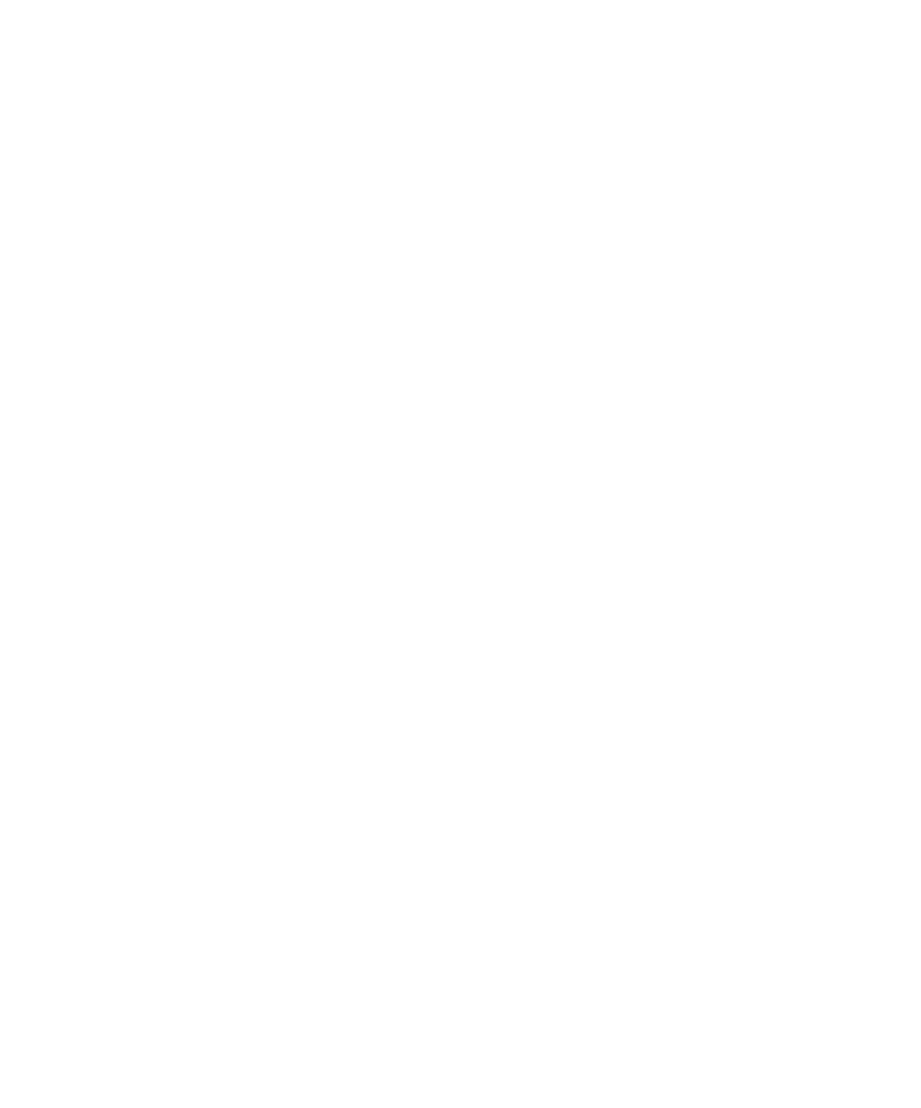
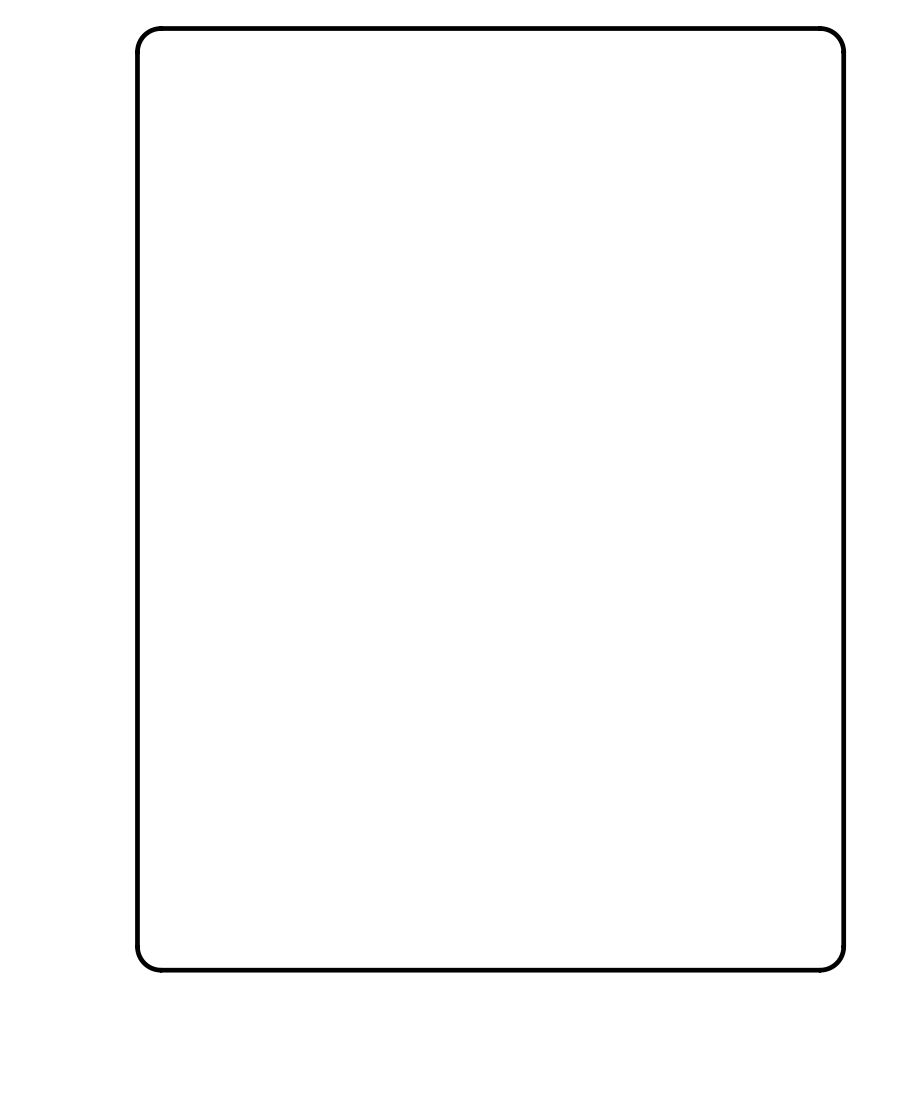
board edge: none -> (161, 28) (820, 28) (831, 31) (838, 37) (843, 52) (843, 946) (840, 958) (834, 965) (820, 970) (161, 970) (152, 968) (142, 960) (137, 946) (137, 52) (139, 43) (144, 35) (152, 30) (161, 28)

